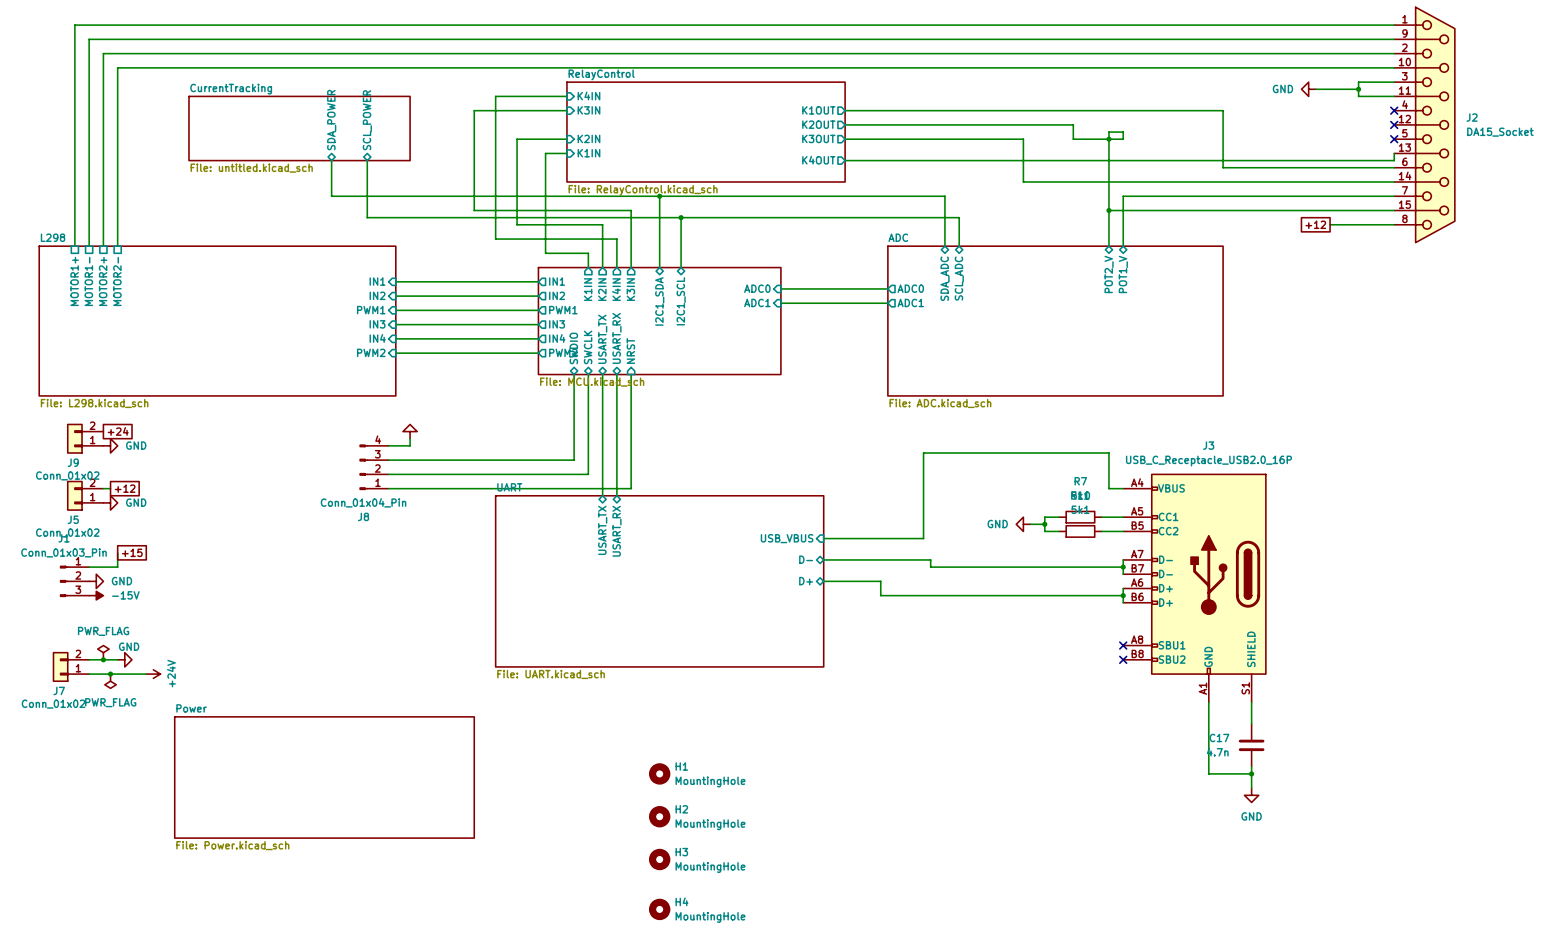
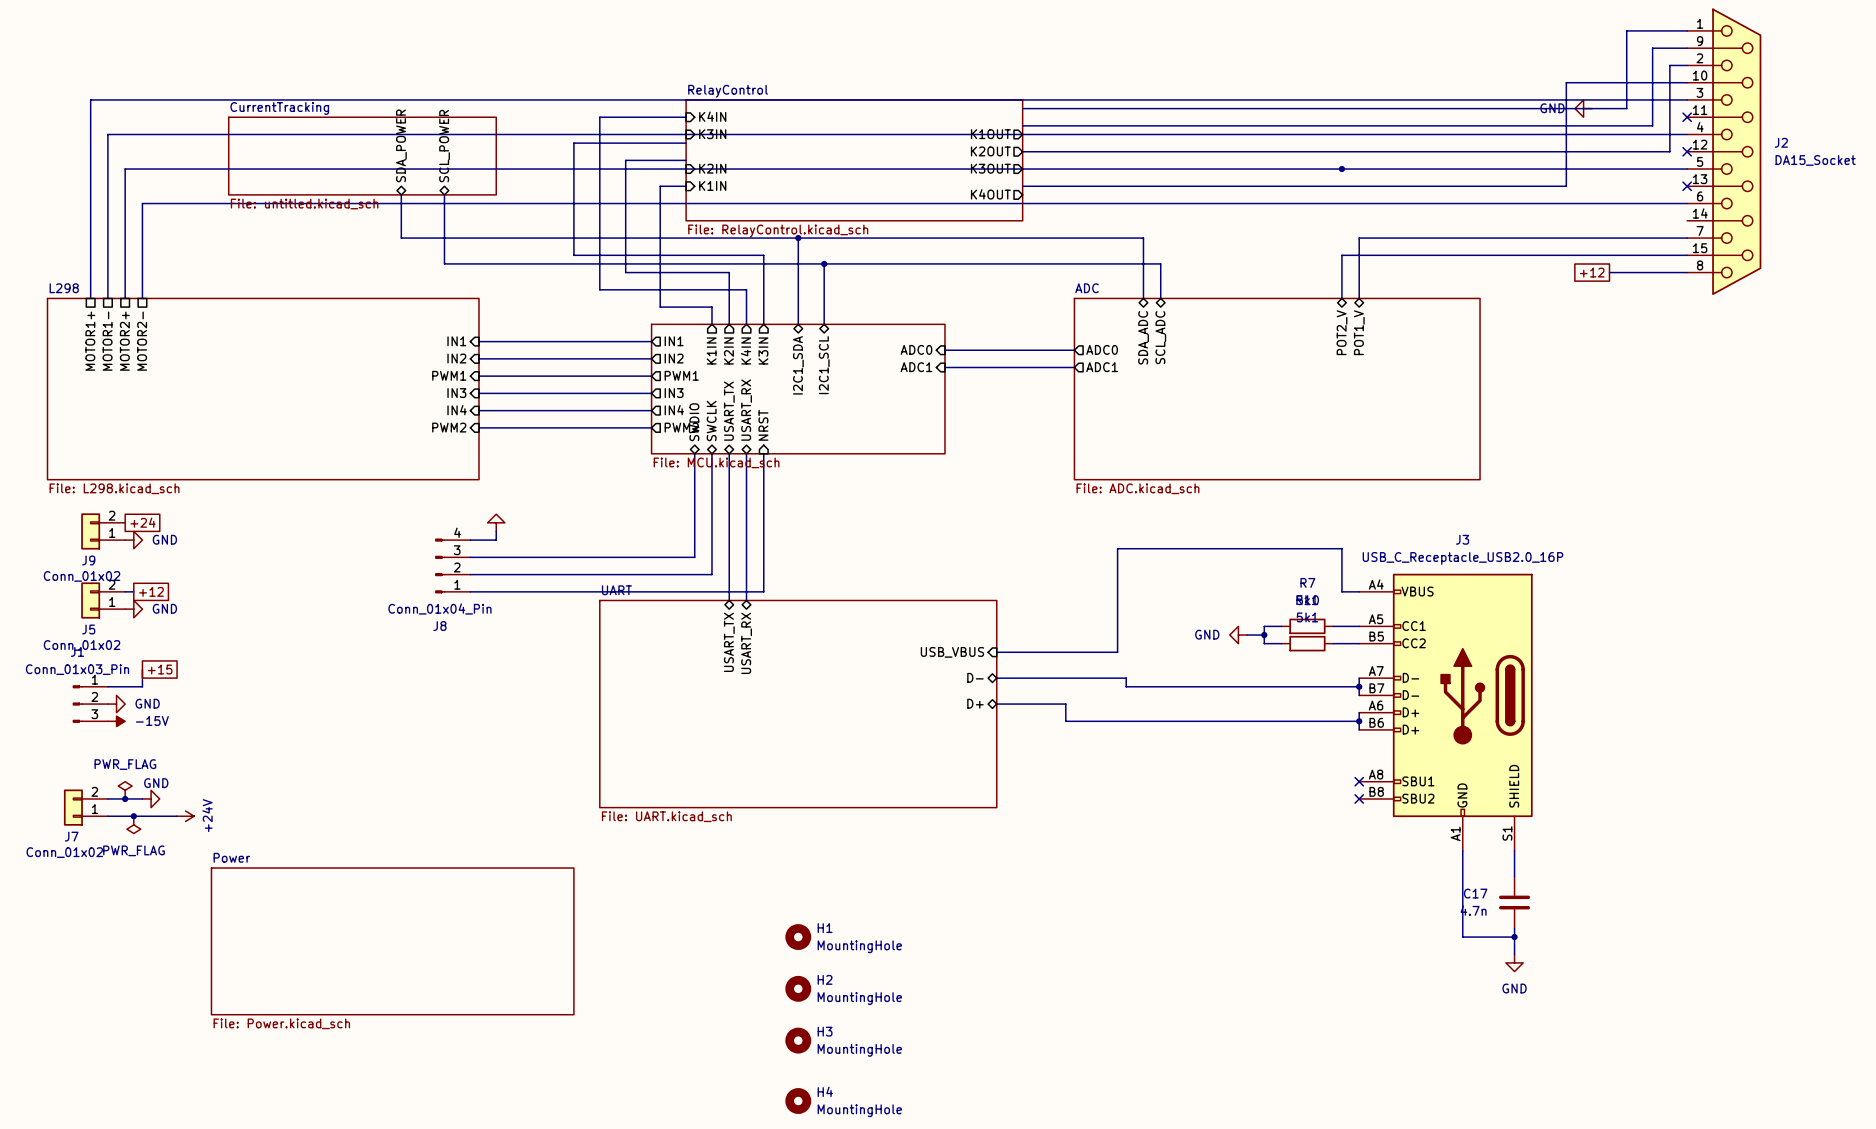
wire: (1344, 25) (74, 25) (74, 82) -> (1643, 99) (90, 99)
wire: (1365, 39) (89, 39) (89, 110) -> (1652, 48) (1652, 125) (1022, 125)
wire: (1379, 53) (103, 53) (103, 139) -> (686, 160) (625, 160) (625, 169) (125, 169)
wire: none -> (1669, 65) (1669, 151) (1298, 151)
wire: (1294, 67) (117, 67) (117, 167) -> (1480, 203) (142, 203)
wire: none -> (1566, 82) (1566, 186) (1022, 186)
wire: (1358, 82) (1358, 96) (1394, 96) -> none
wire: none -> (1022, 108) (1592, 108)
wire: (1344, 89) (1358, 89) -> (1626, 108) (1626, 30)
junction: (1358, 89) -> none
wire: none -> (107, 134) (573, 134)
wire: (474, 110) (474, 117) -> (686, 143) (573, 143)
wire: none -> (686, 134) (1022, 134)
wire: (1223, 110) (1223, 167) -> (1480, 134) (1687, 134)
no-connect mark position: (1394, 110) -> (1687, 117)
wire: (1073, 124) (1073, 139) -> (1238, 169) (1298, 169)
wire: none -> (686, 169) (1022, 169)
wire: (1023, 139) (1023, 181) (1394, 181) -> none
wire: (1123, 139) (1123, 132) (1108, 132) (1108, 210) -> (1359, 169) (1687, 169)
no-connect mark position: (1394, 139) -> (1687, 186)
wire: (1394, 153) (1394, 160) (845, 160) -> none
junction: (1108, 210) -> none

